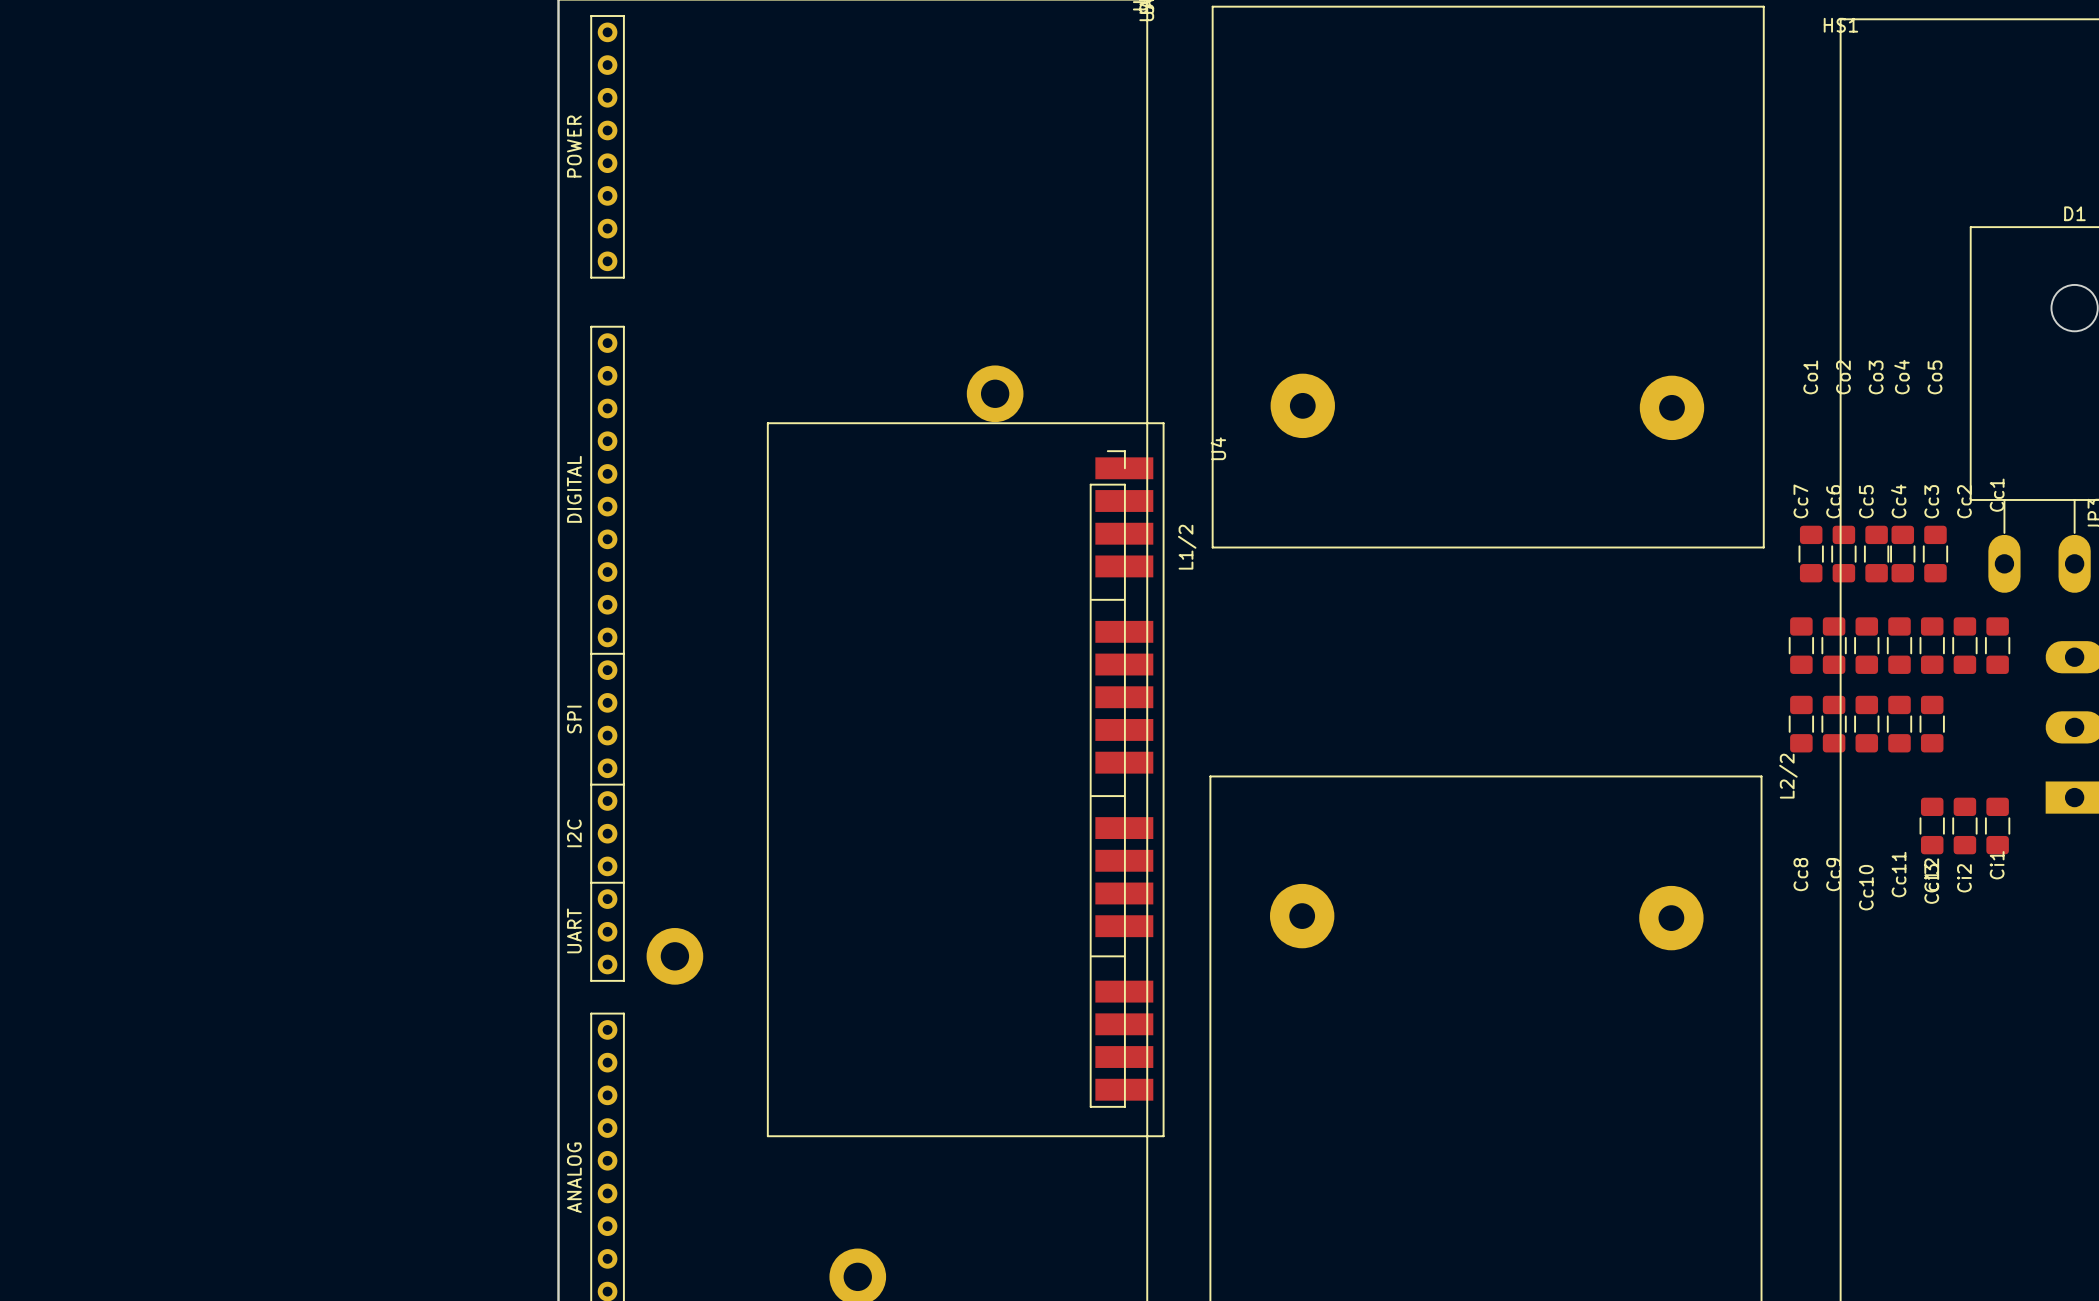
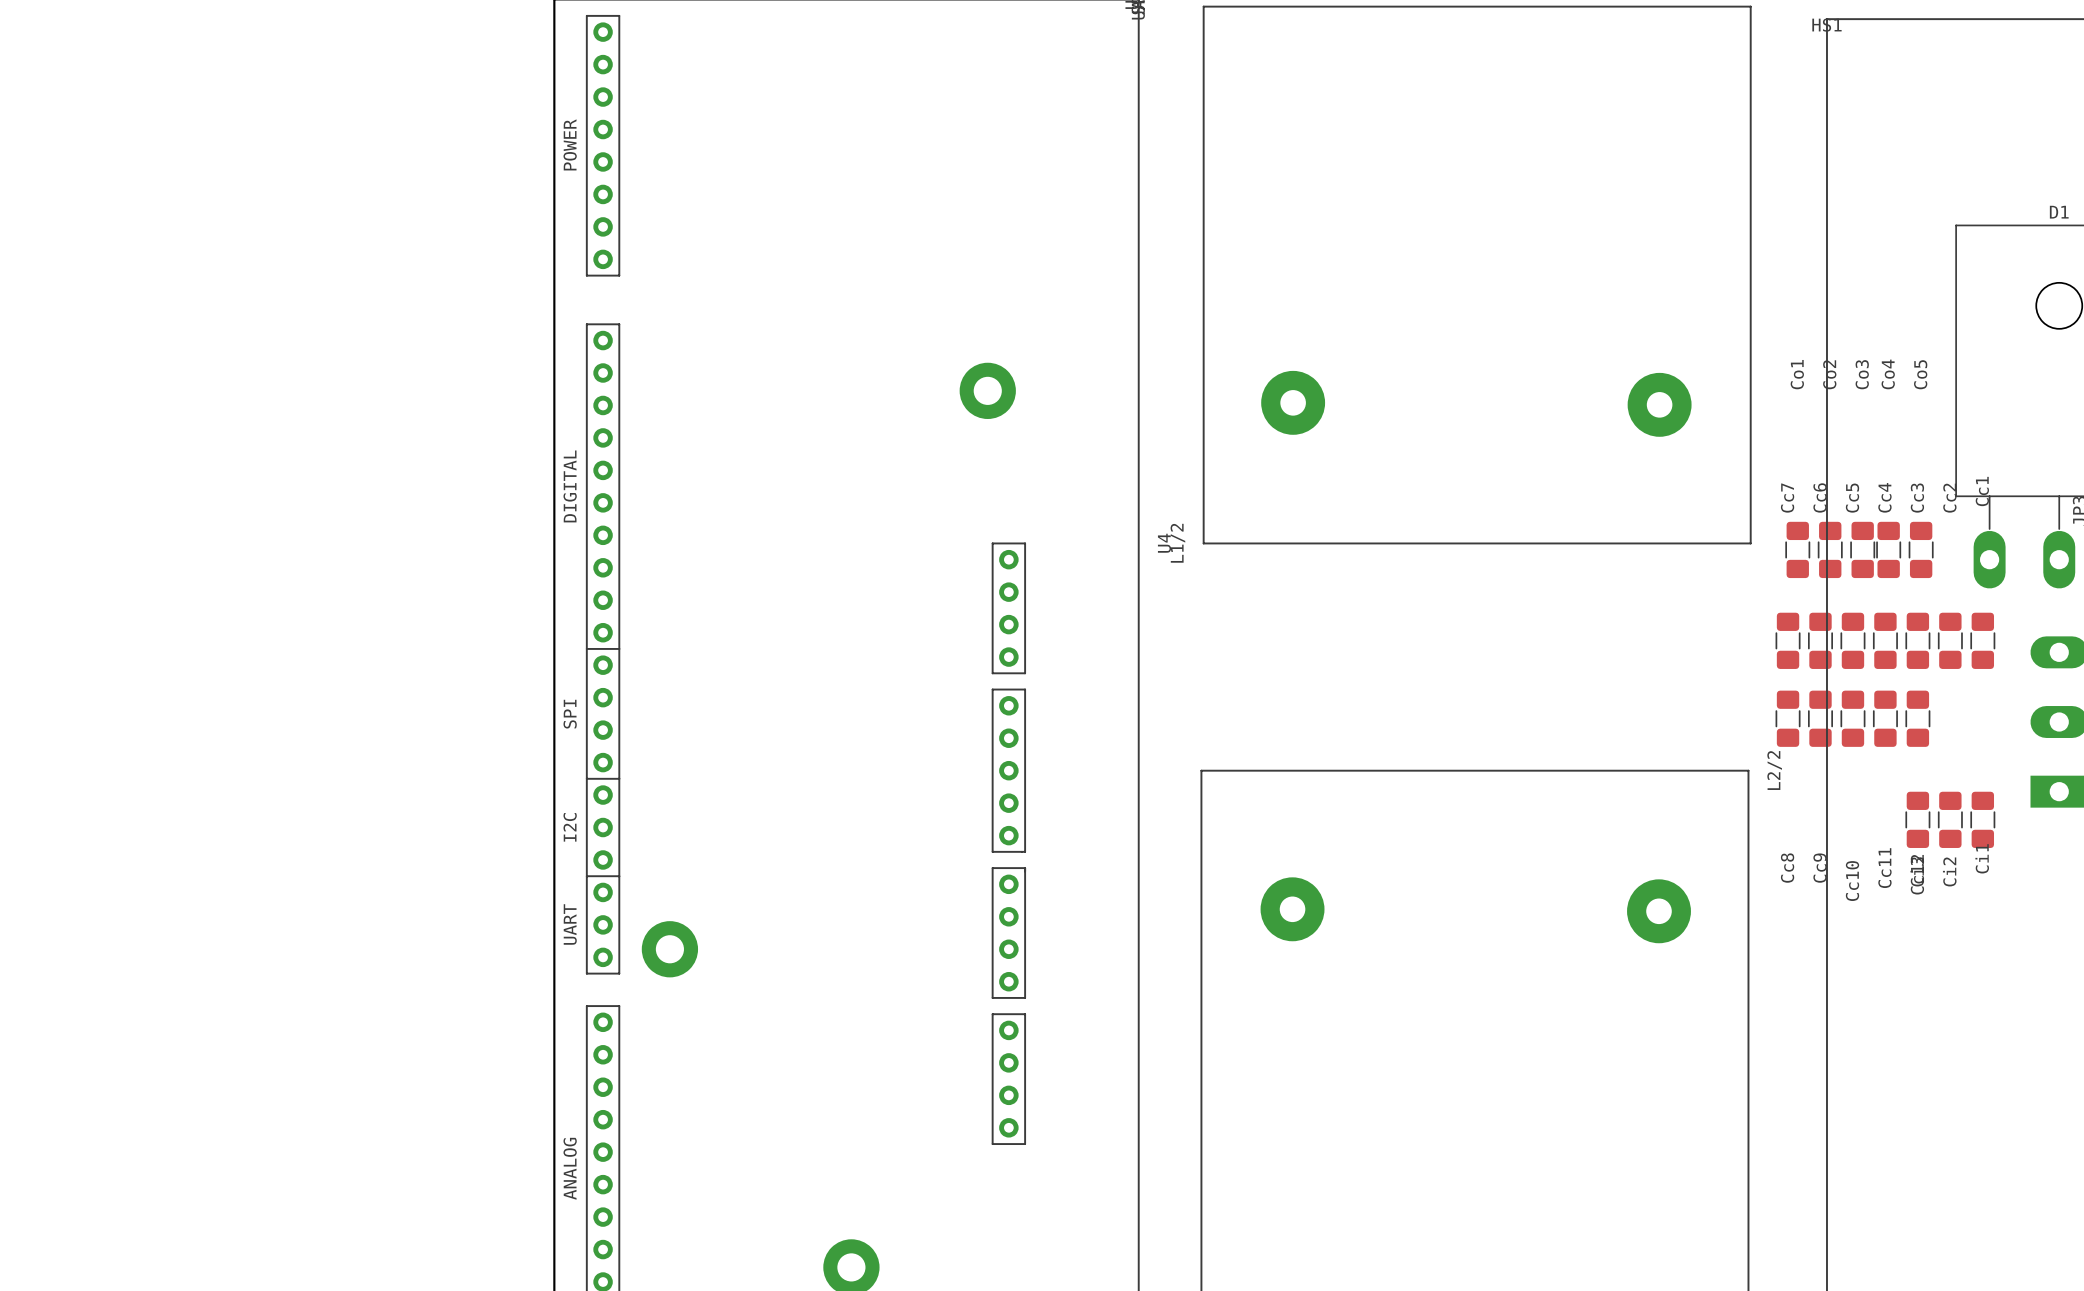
U4 footprint: [766, 422, 1165, 1138] -> [991, 542, 1027, 1146]
U4 name position: U4 (1218, 448) -> U4 (1164, 543)

